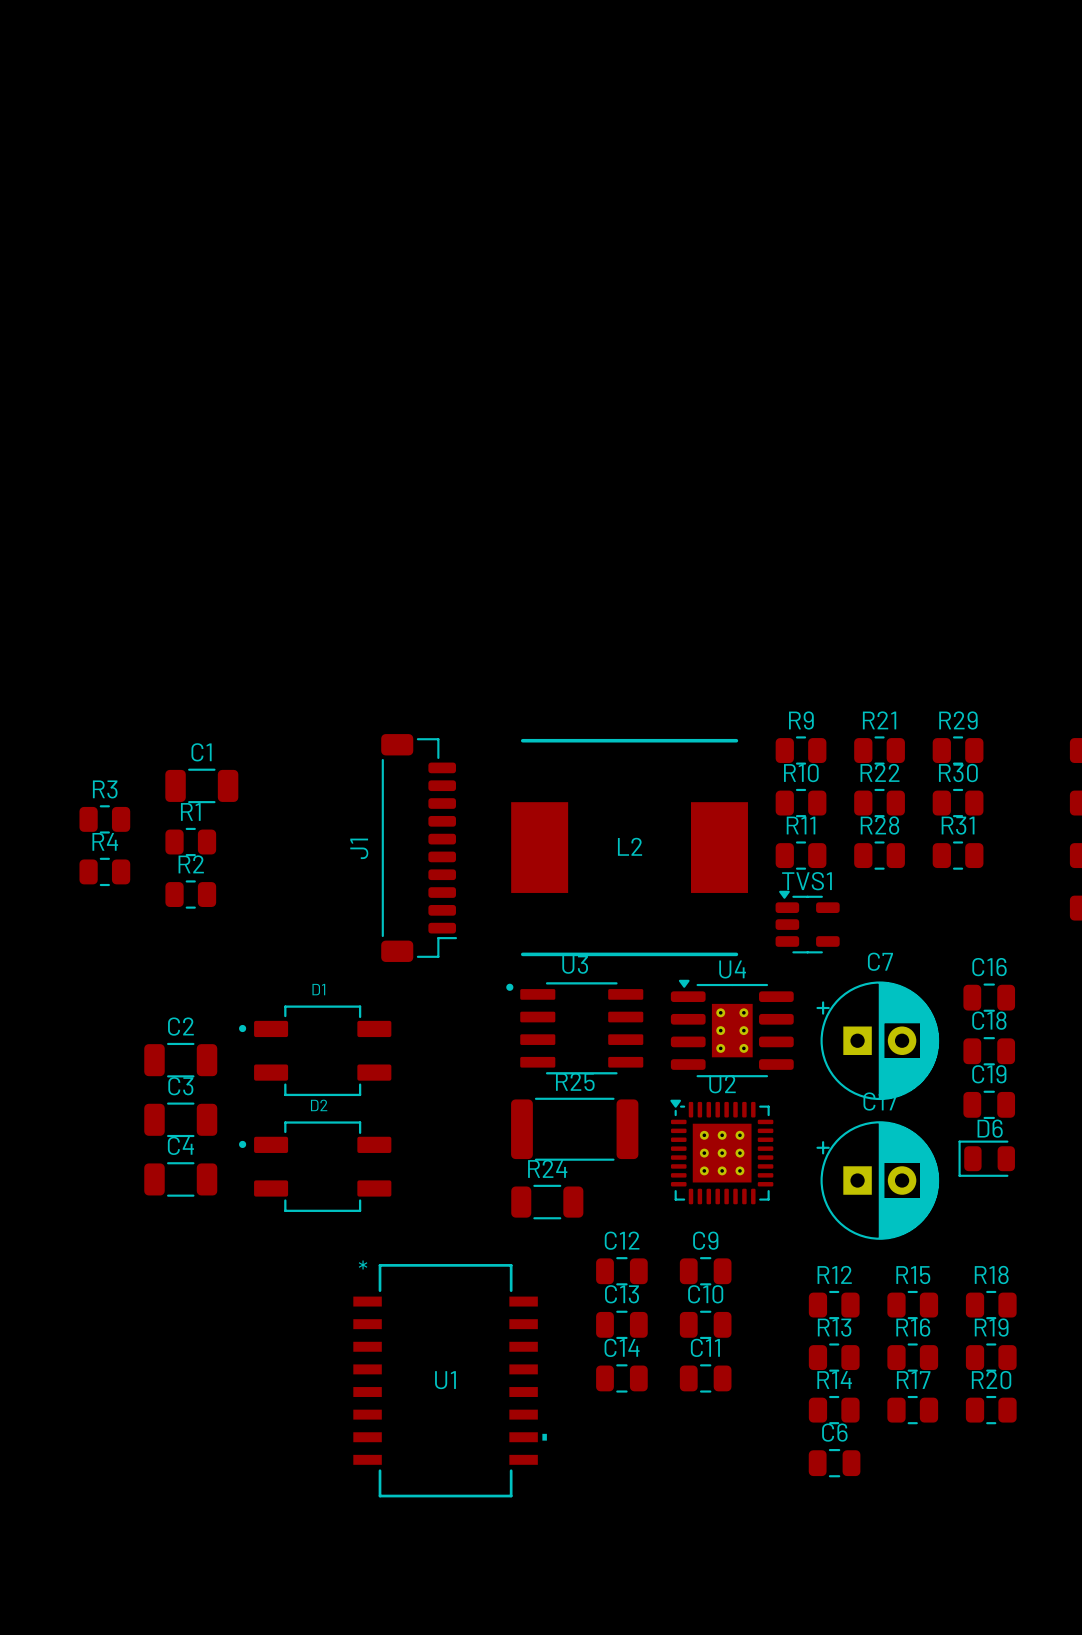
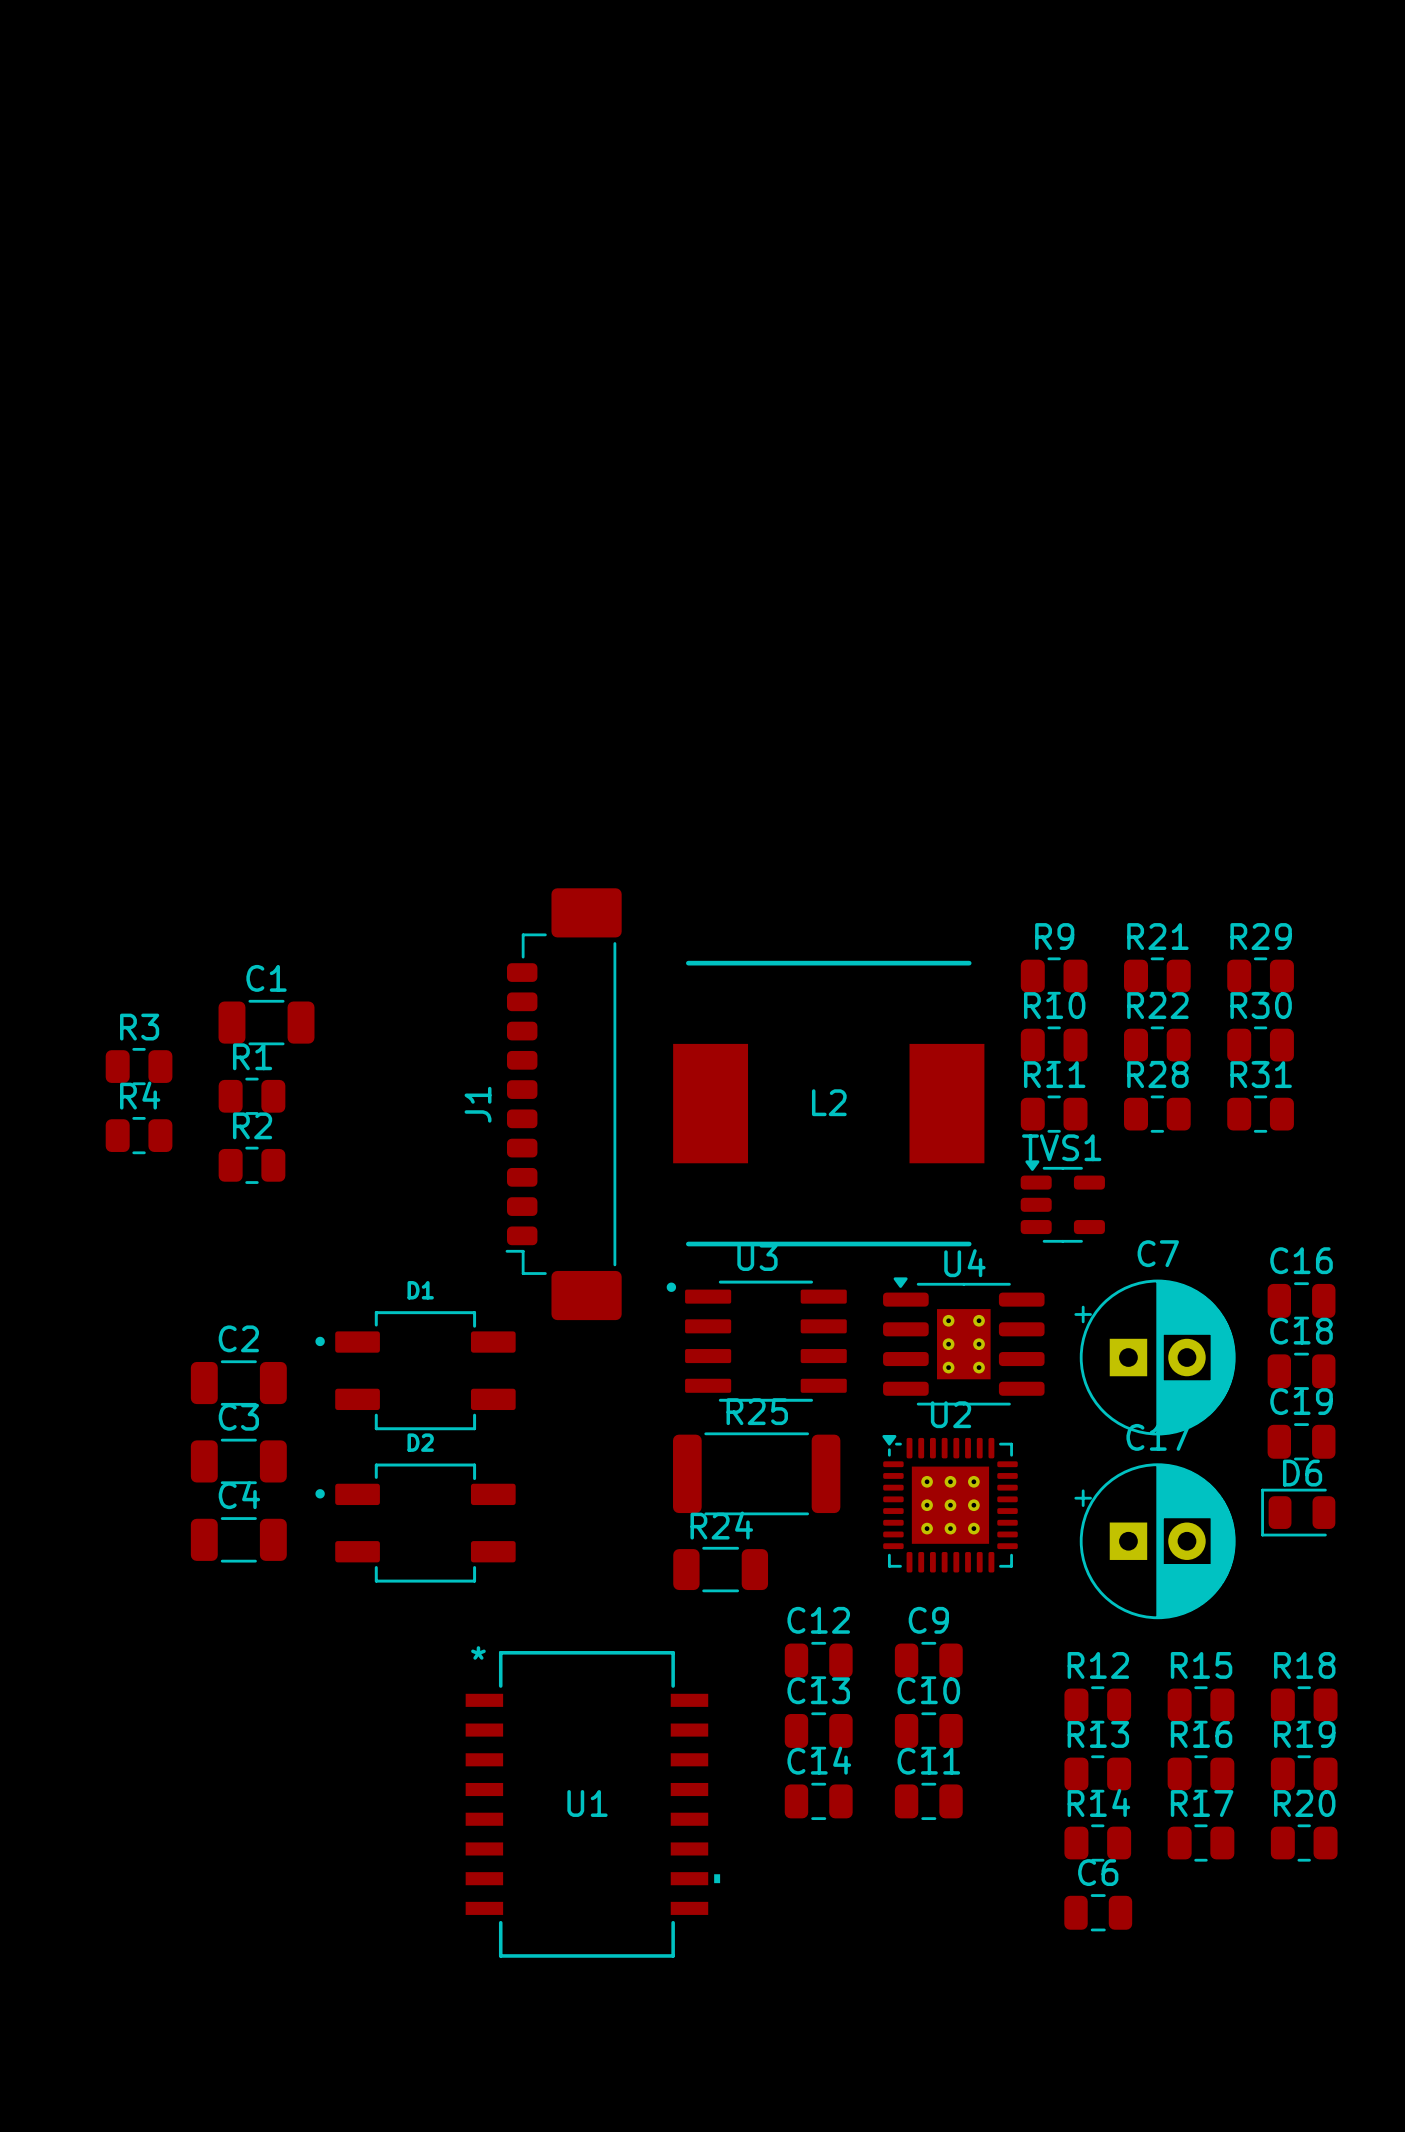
J1 footprint: [381, 734, 458, 962] -> [505, 888, 622, 1321]

